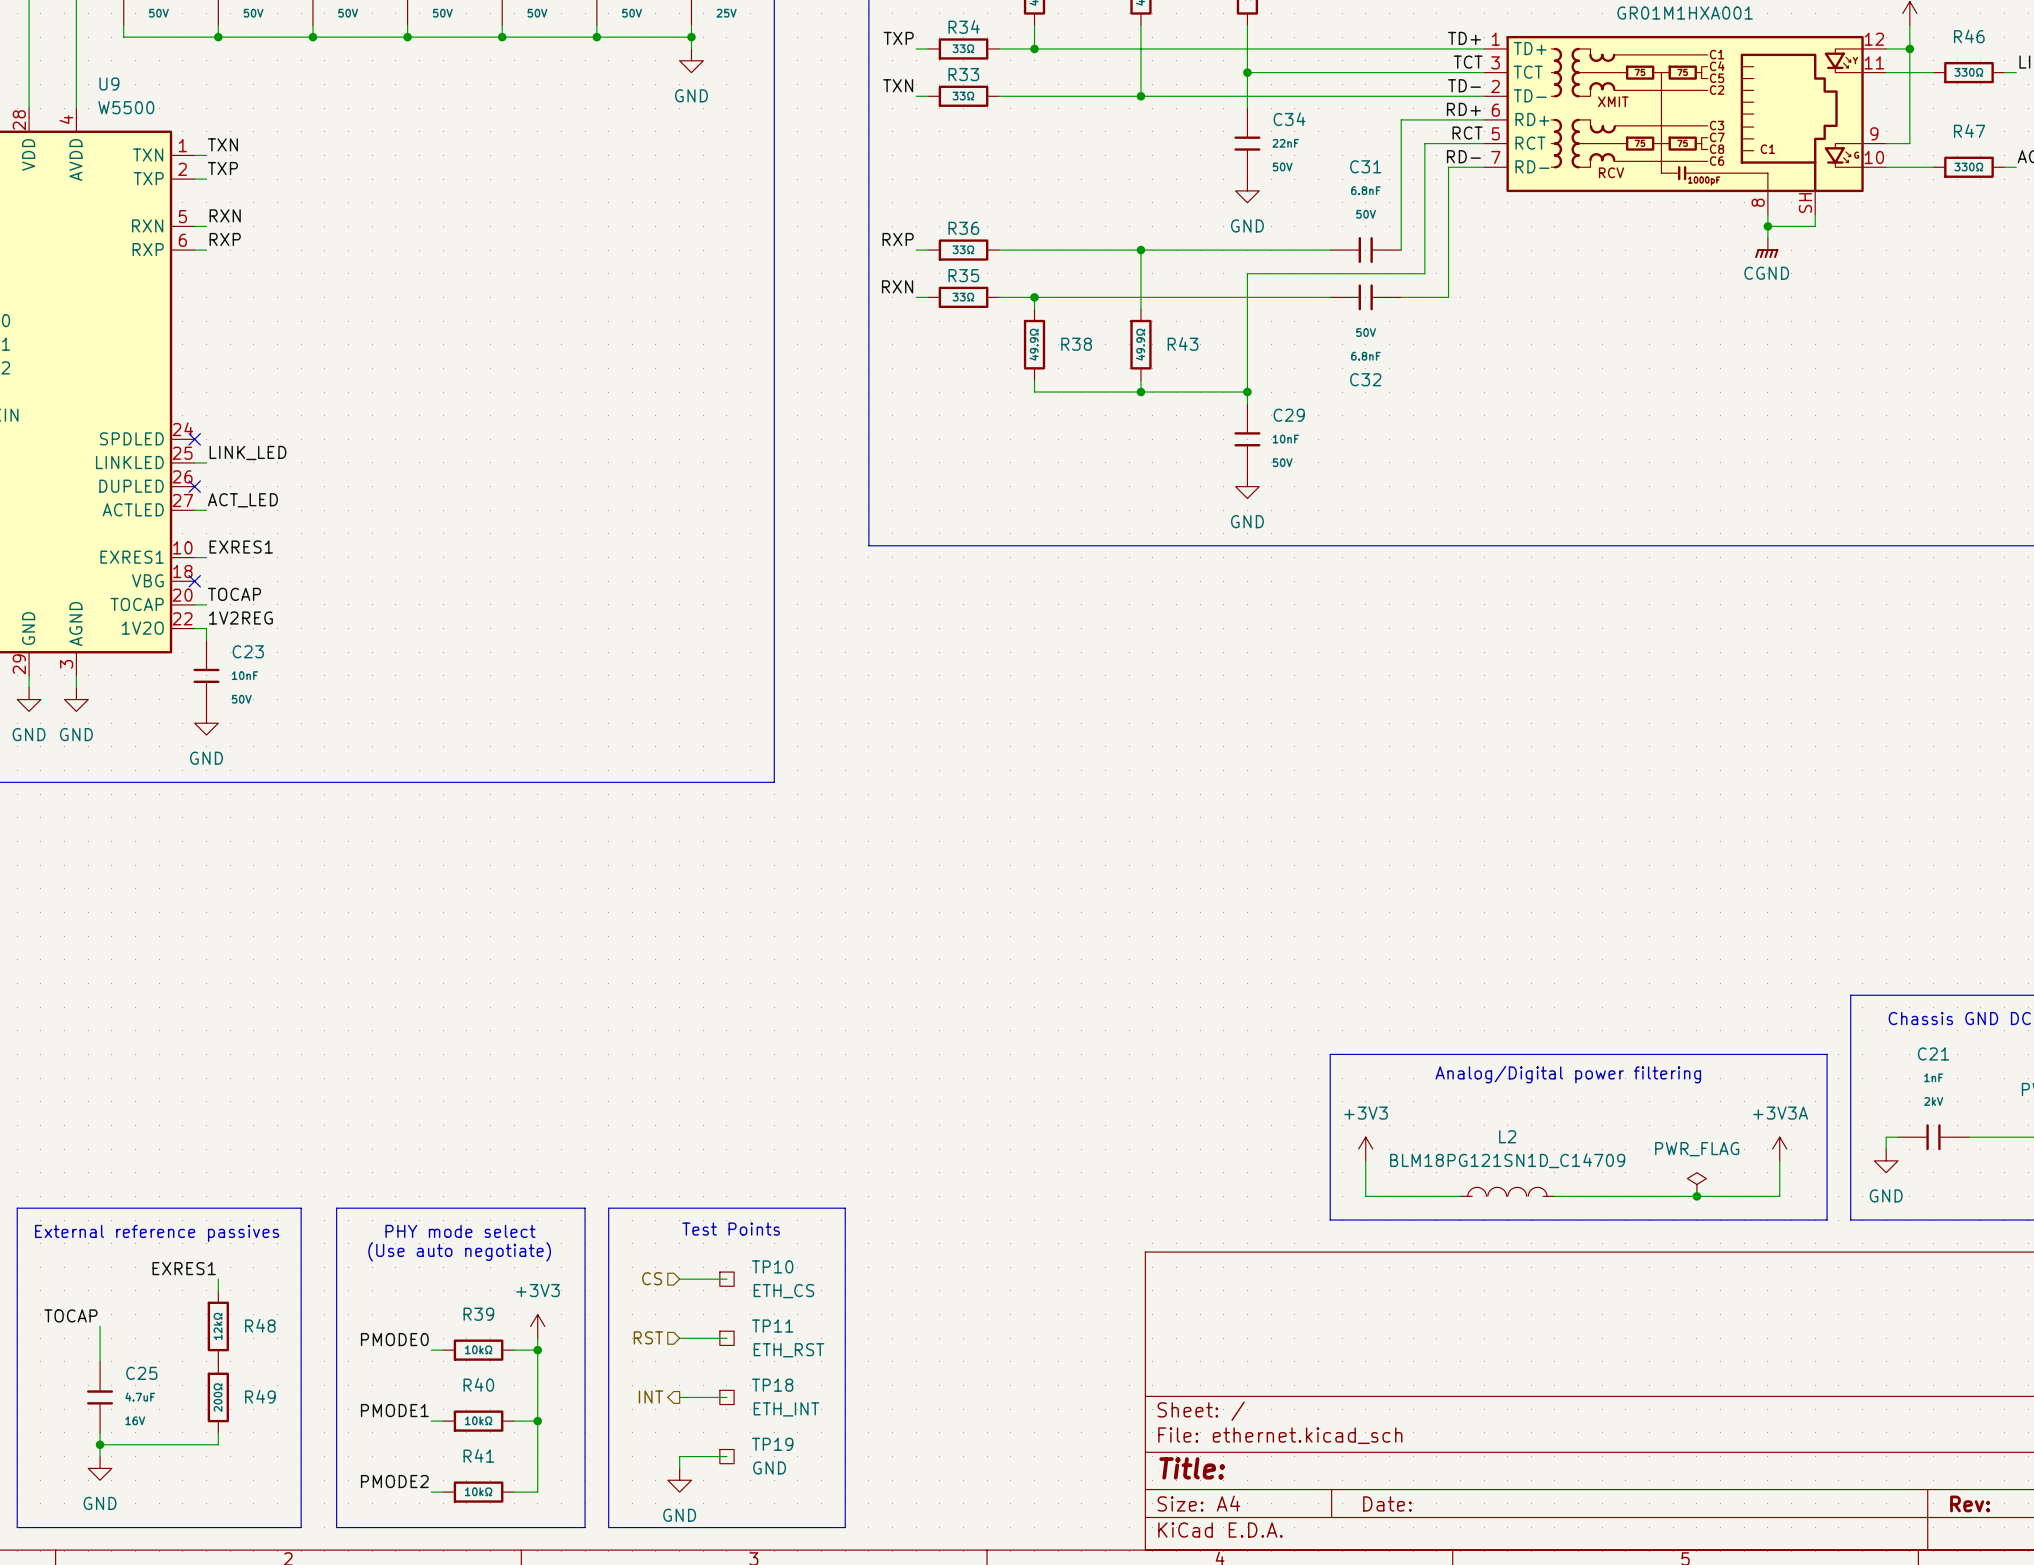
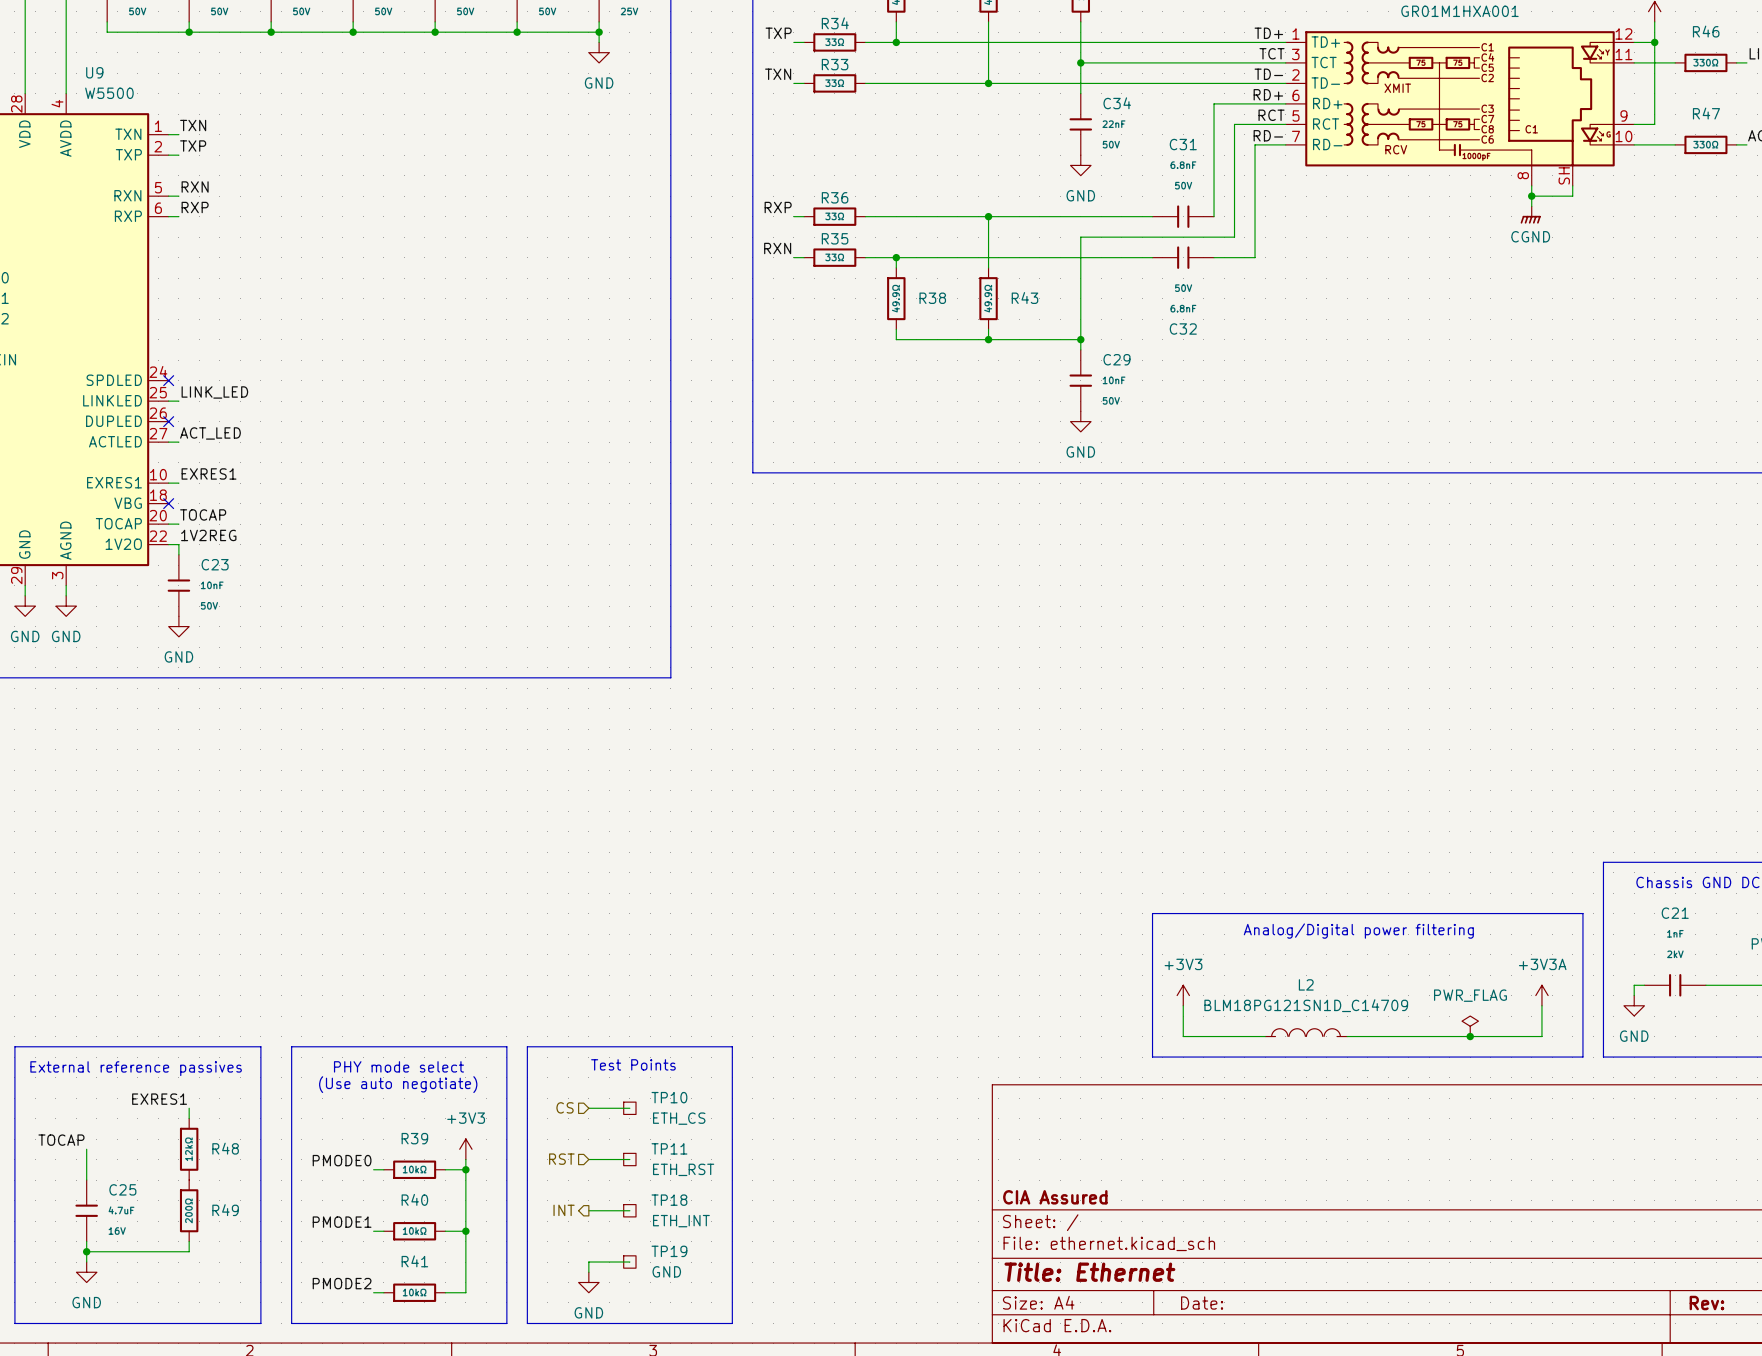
title block: none -> CIA Assured (1055, 1197)
title block: Title: (1192, 1468) -> Title: Ethernet (1089, 1272)

